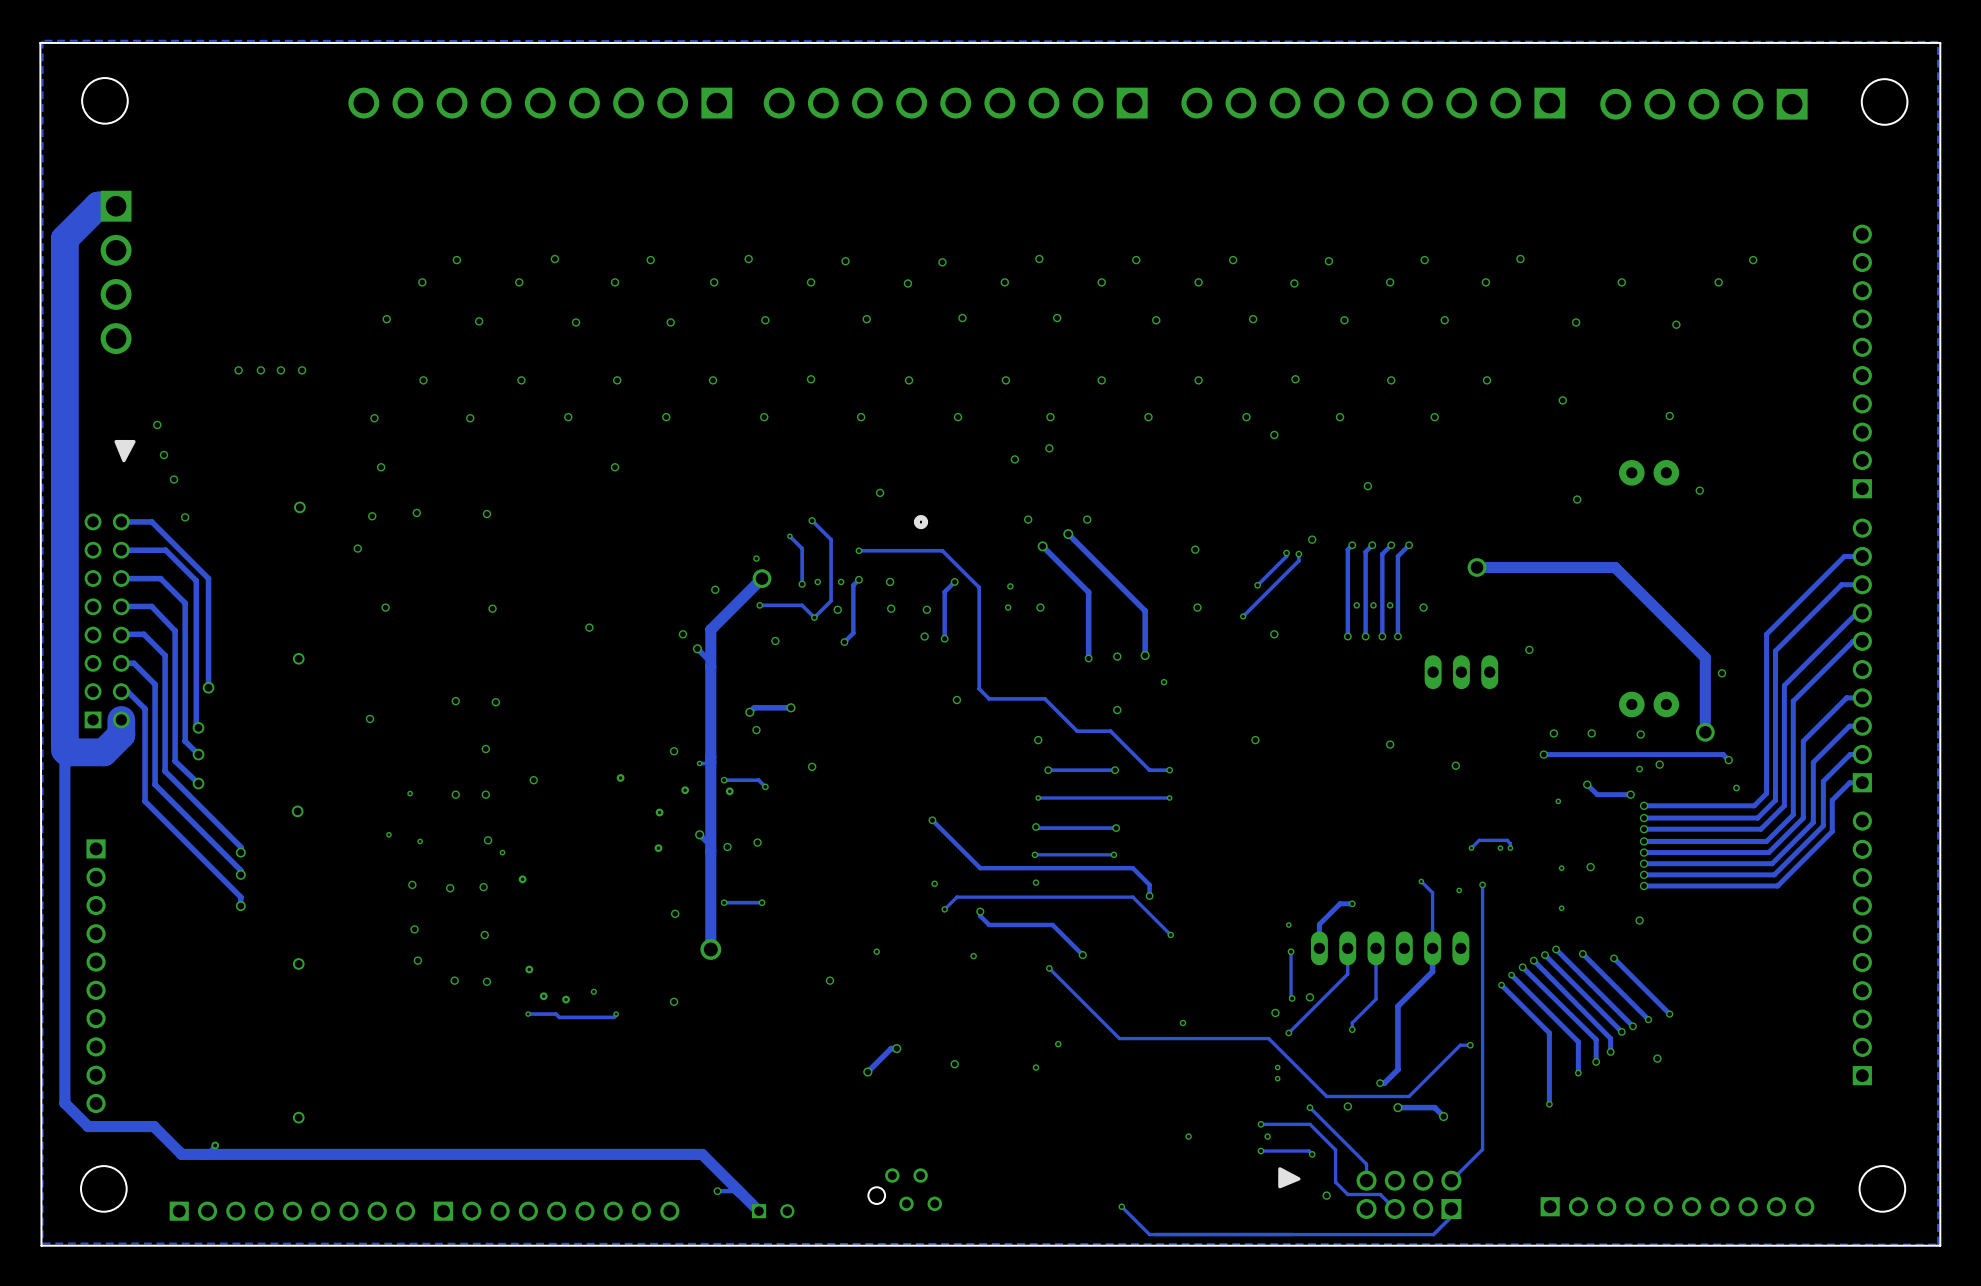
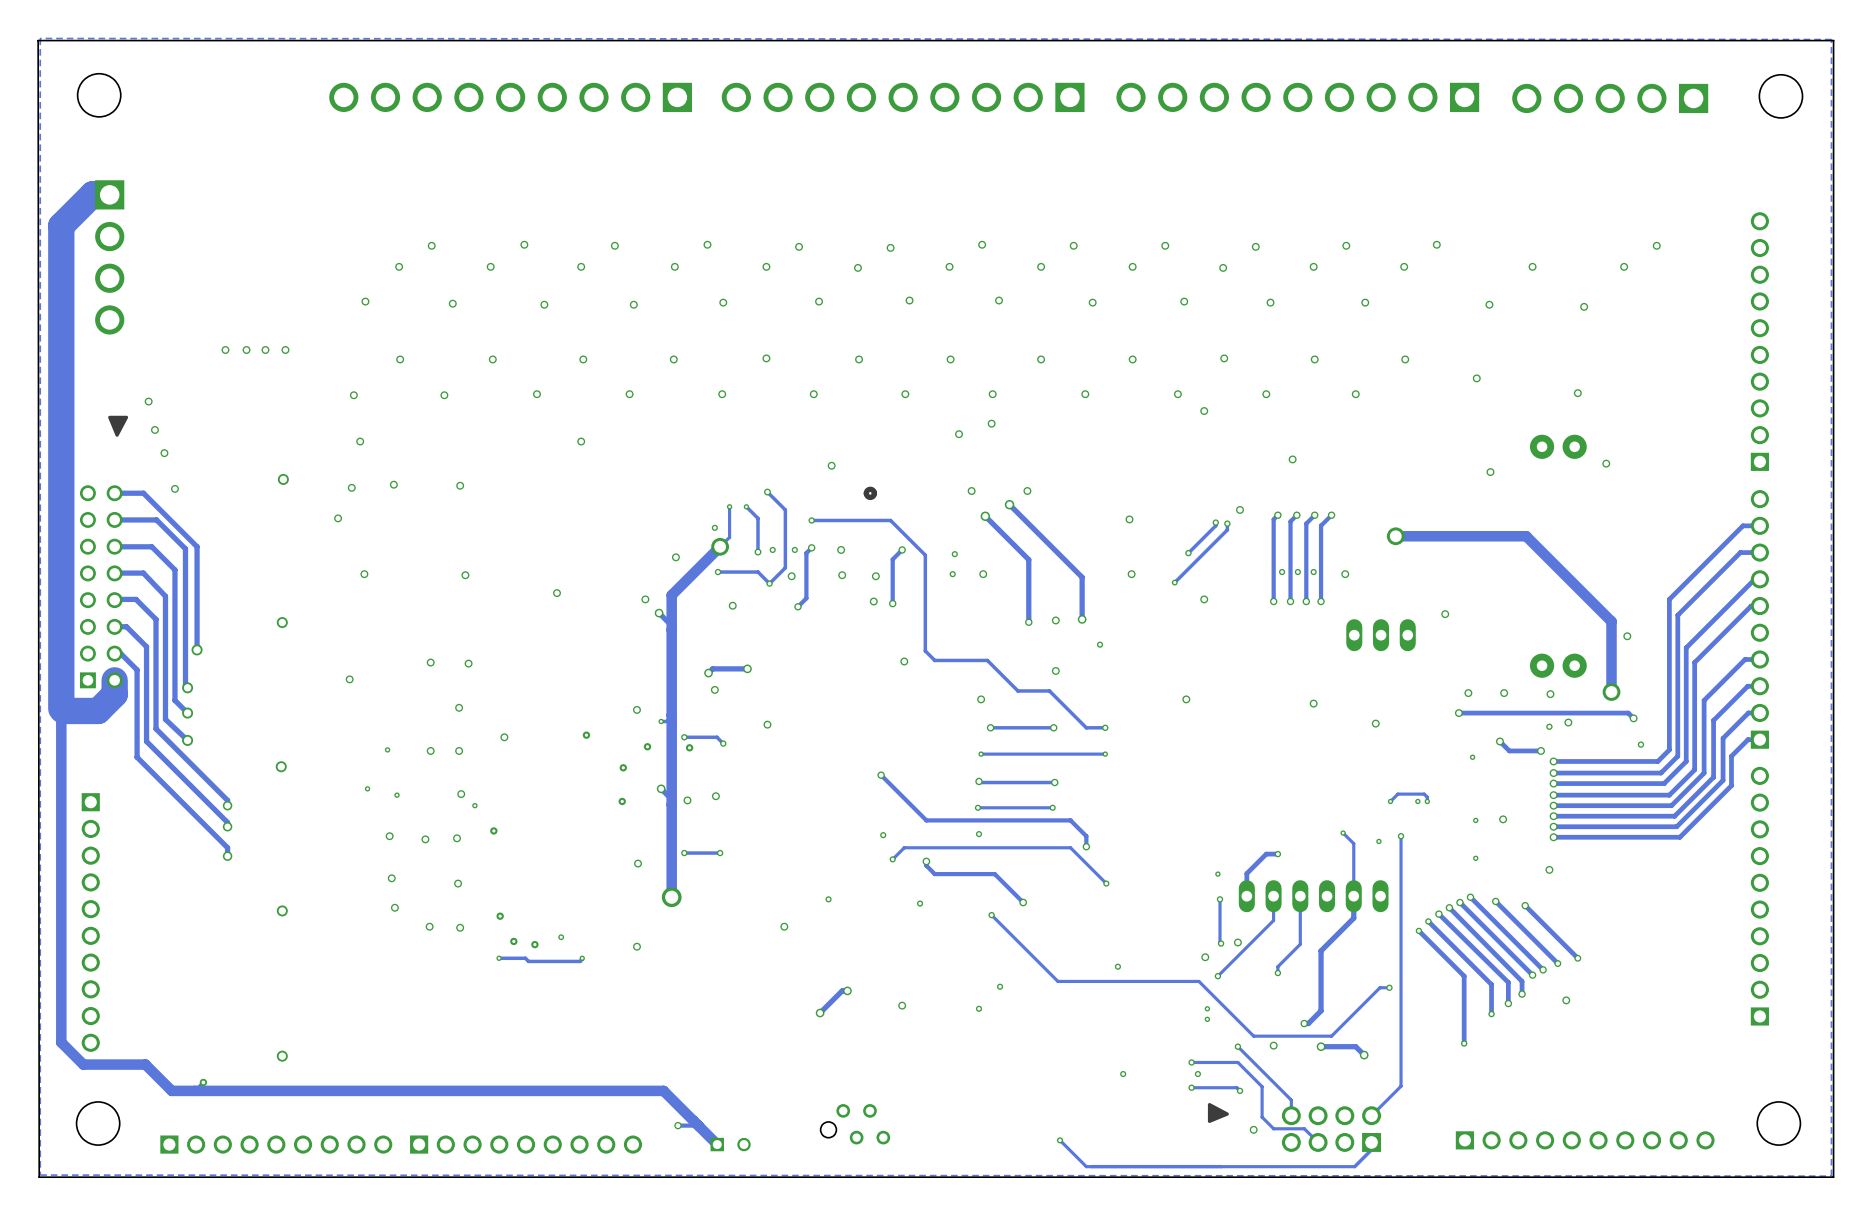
track: none -> (729, 506) (729, 537) (720, 546)
via: none -> (729, 506)

